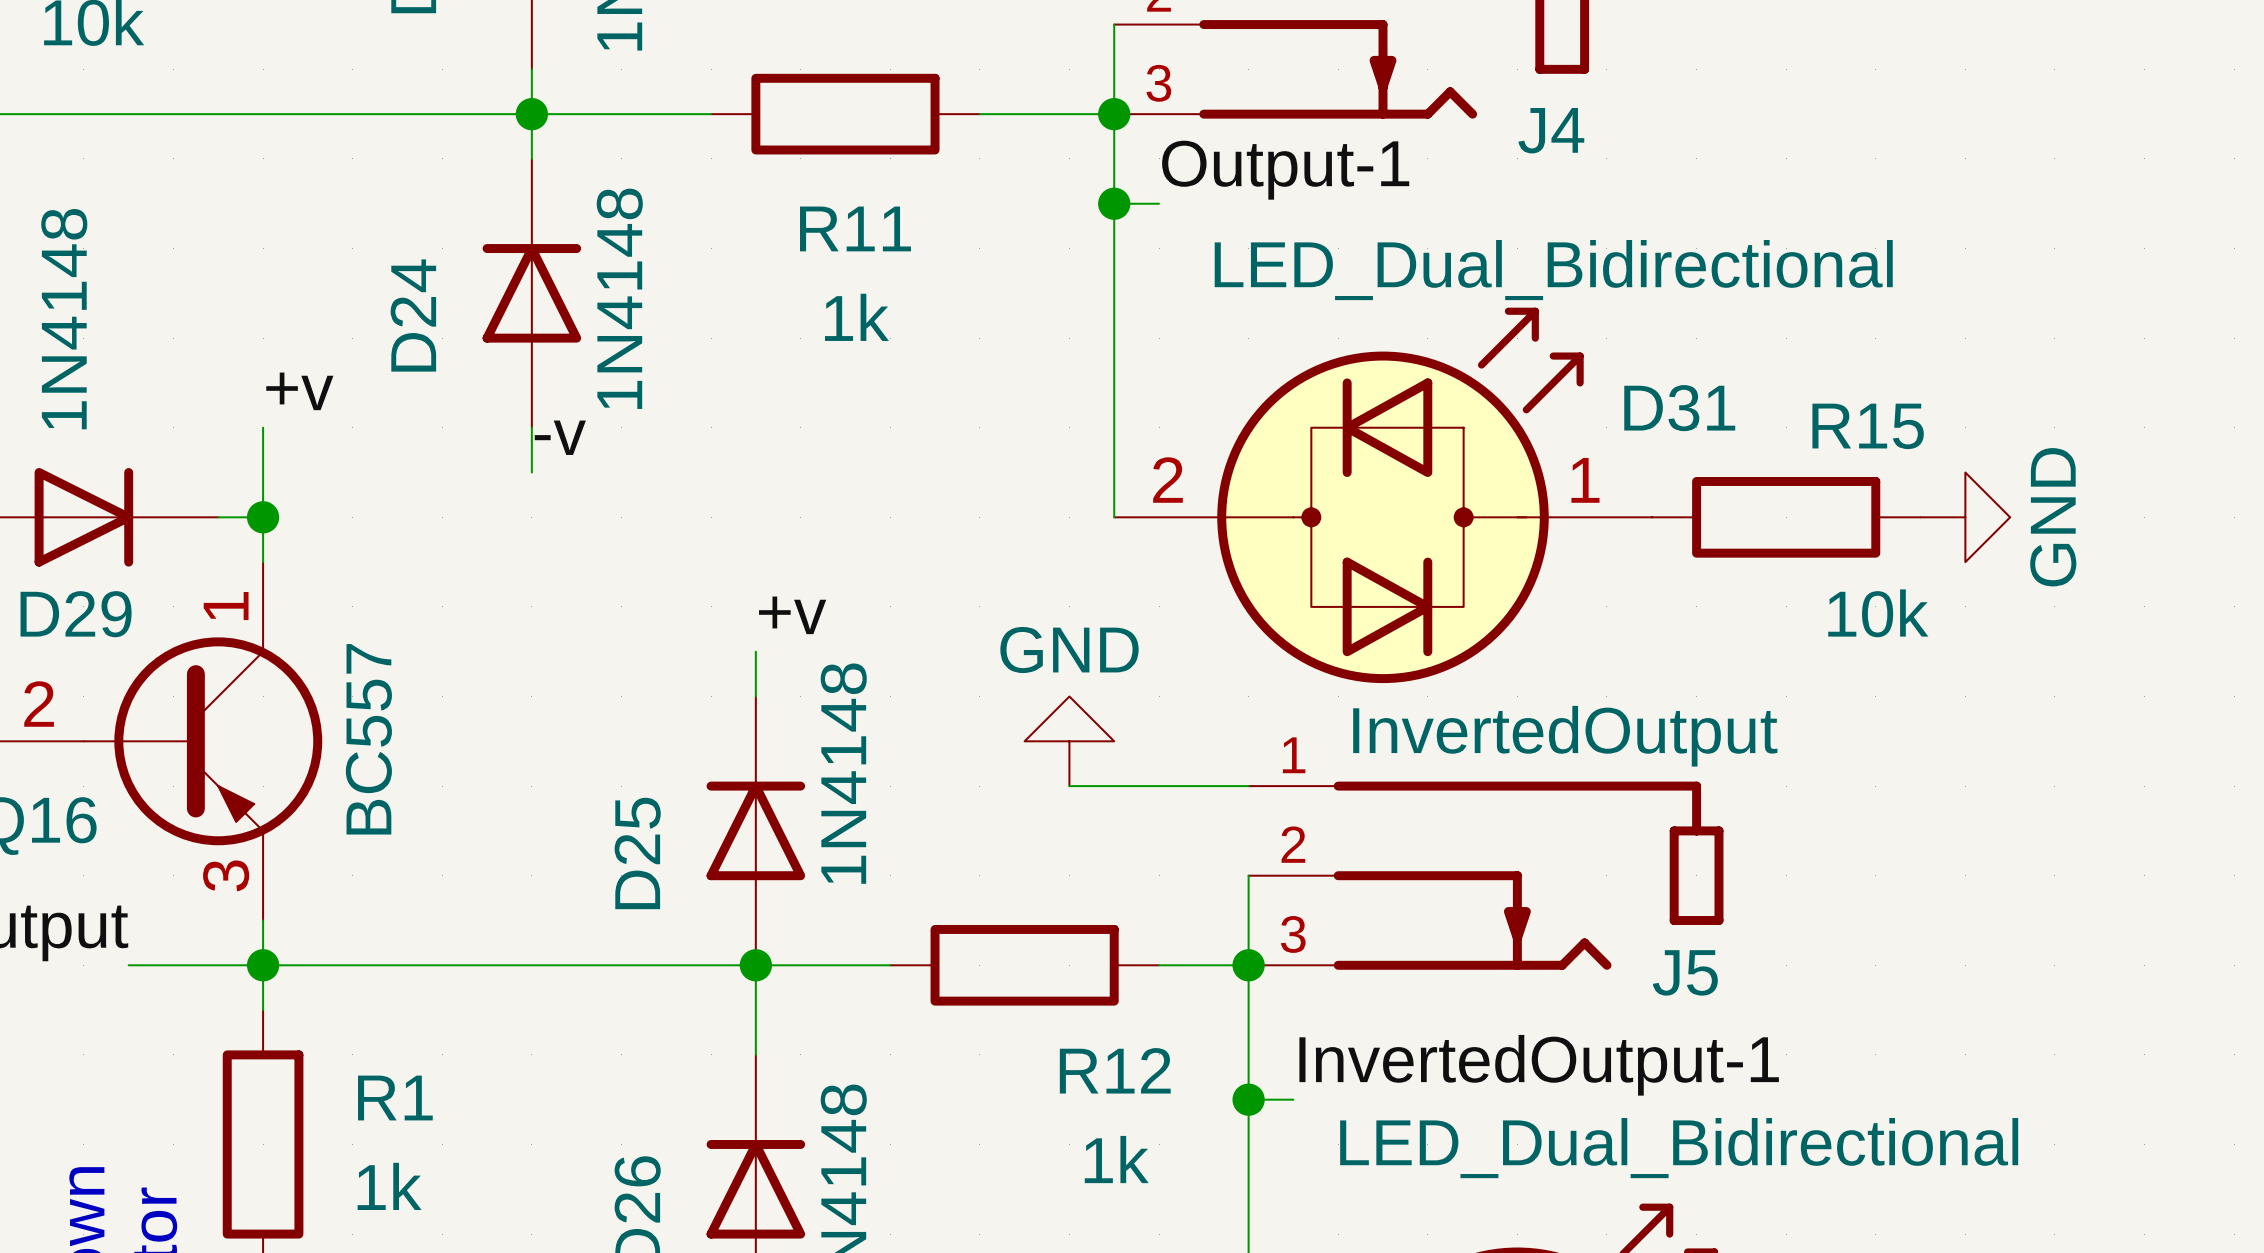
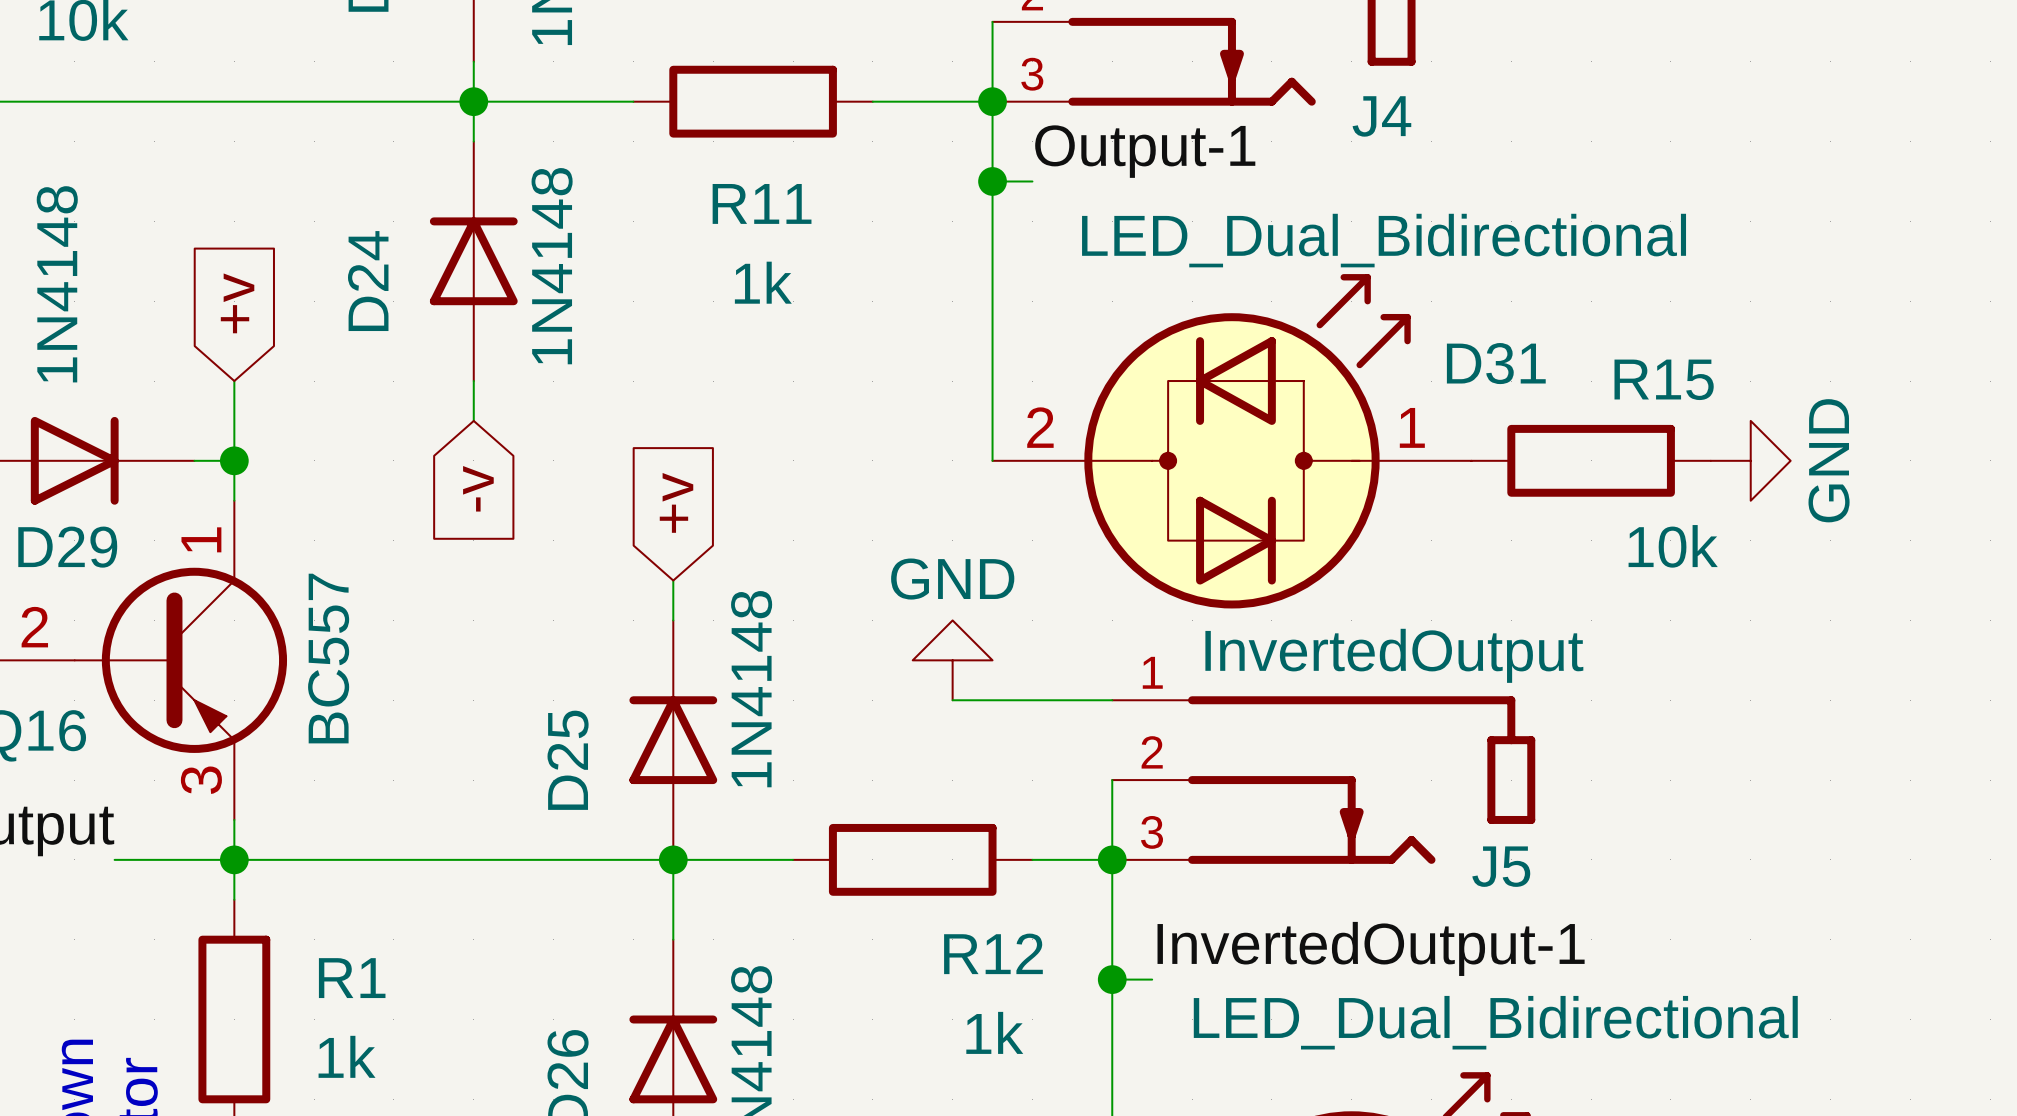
global label: none -> +v (237, 303)
label: +v (299, 391) -> none
label: -v (560, 437) -> none
global label: none -> -v (478, 488)
global label: none -> +v (676, 502)
label: +v (792, 615) -> none

